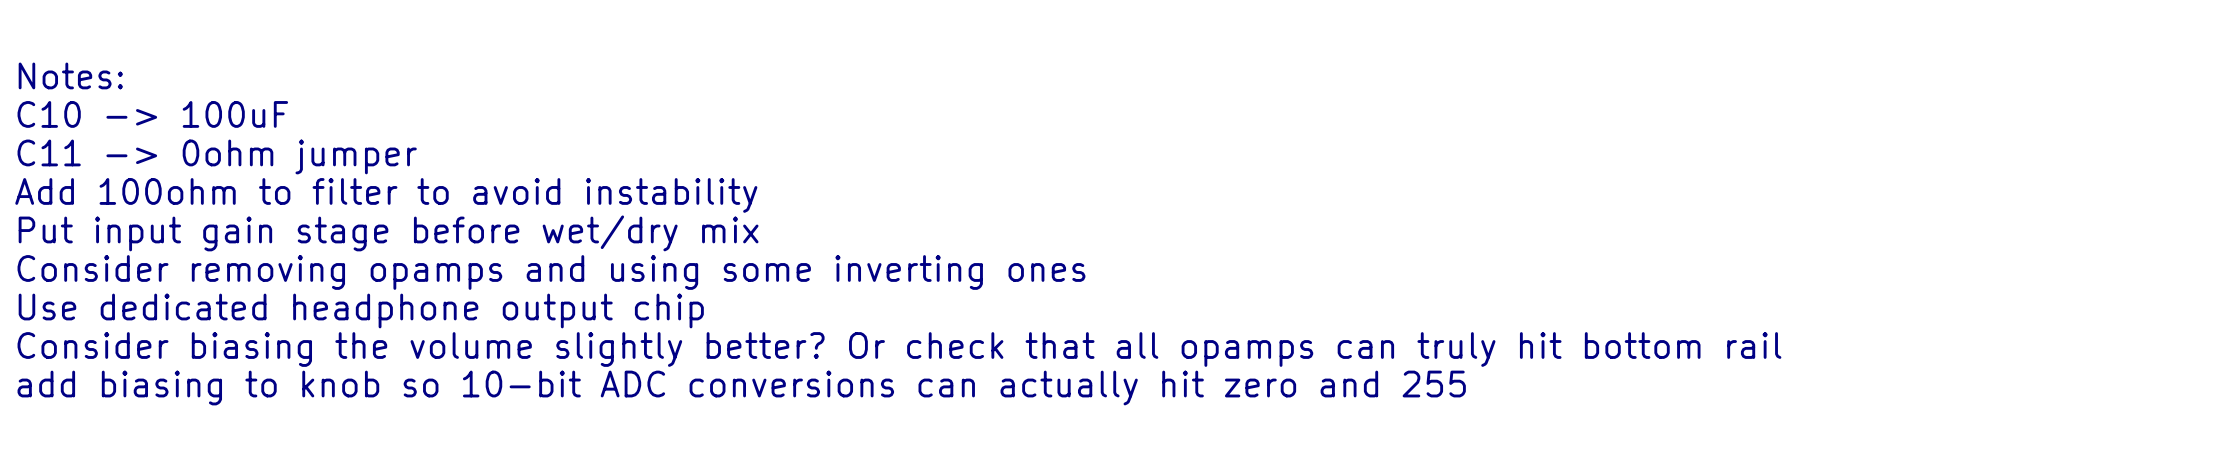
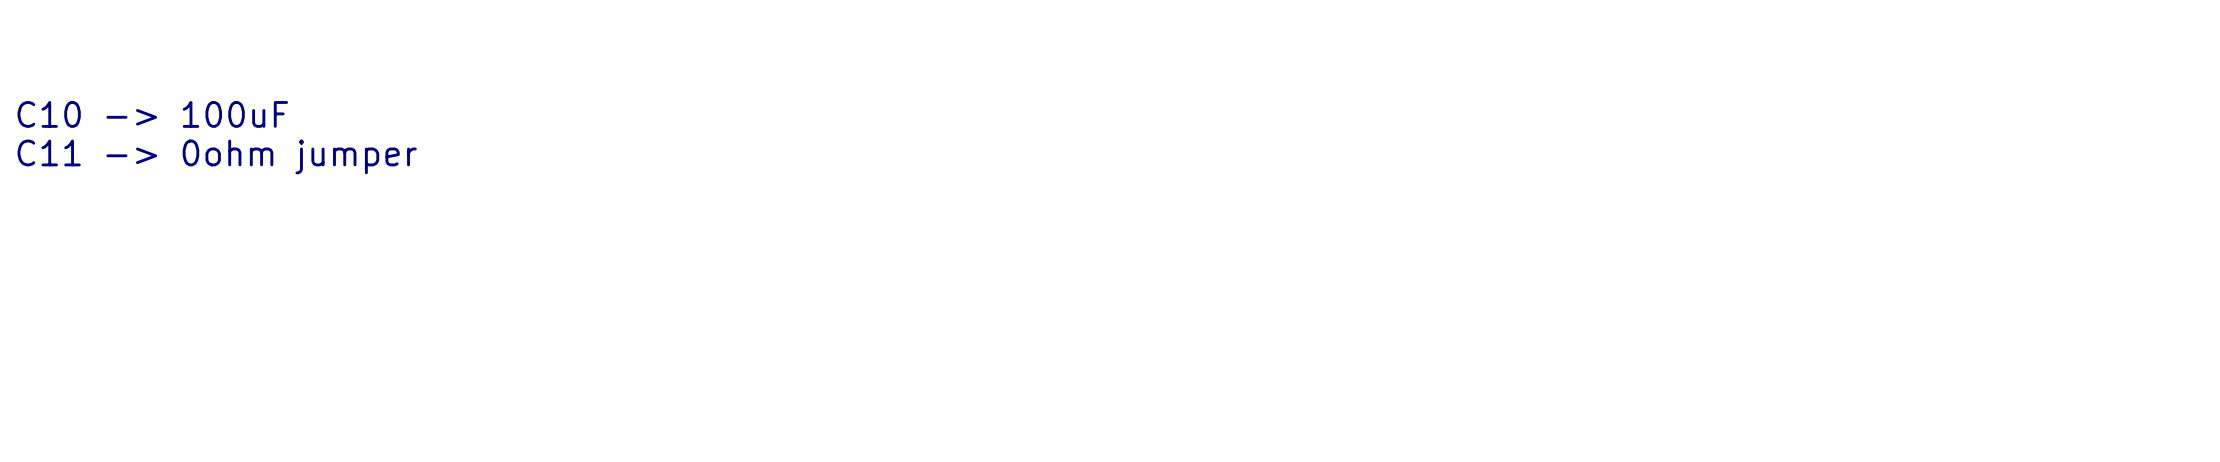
text: Notes: (70, 75) -> none
text: Add 100ohm to filter to avoid instability (386, 195) -> none
text: Put input gain stage before wet/dry mix (388, 233) -> none
text: Consider removing opamps and using some inverting ones (551, 272) -> none
text: Use dedicated headphone output chip (361, 310) -> none
text: Consider biasing the volume slightly better? Or check that all opamps can truly hit bottom rail (899, 349) -> none
text: add biasing to knob so 10-bit ADC conversions can actually hit zero and 255 (741, 388) -> none

